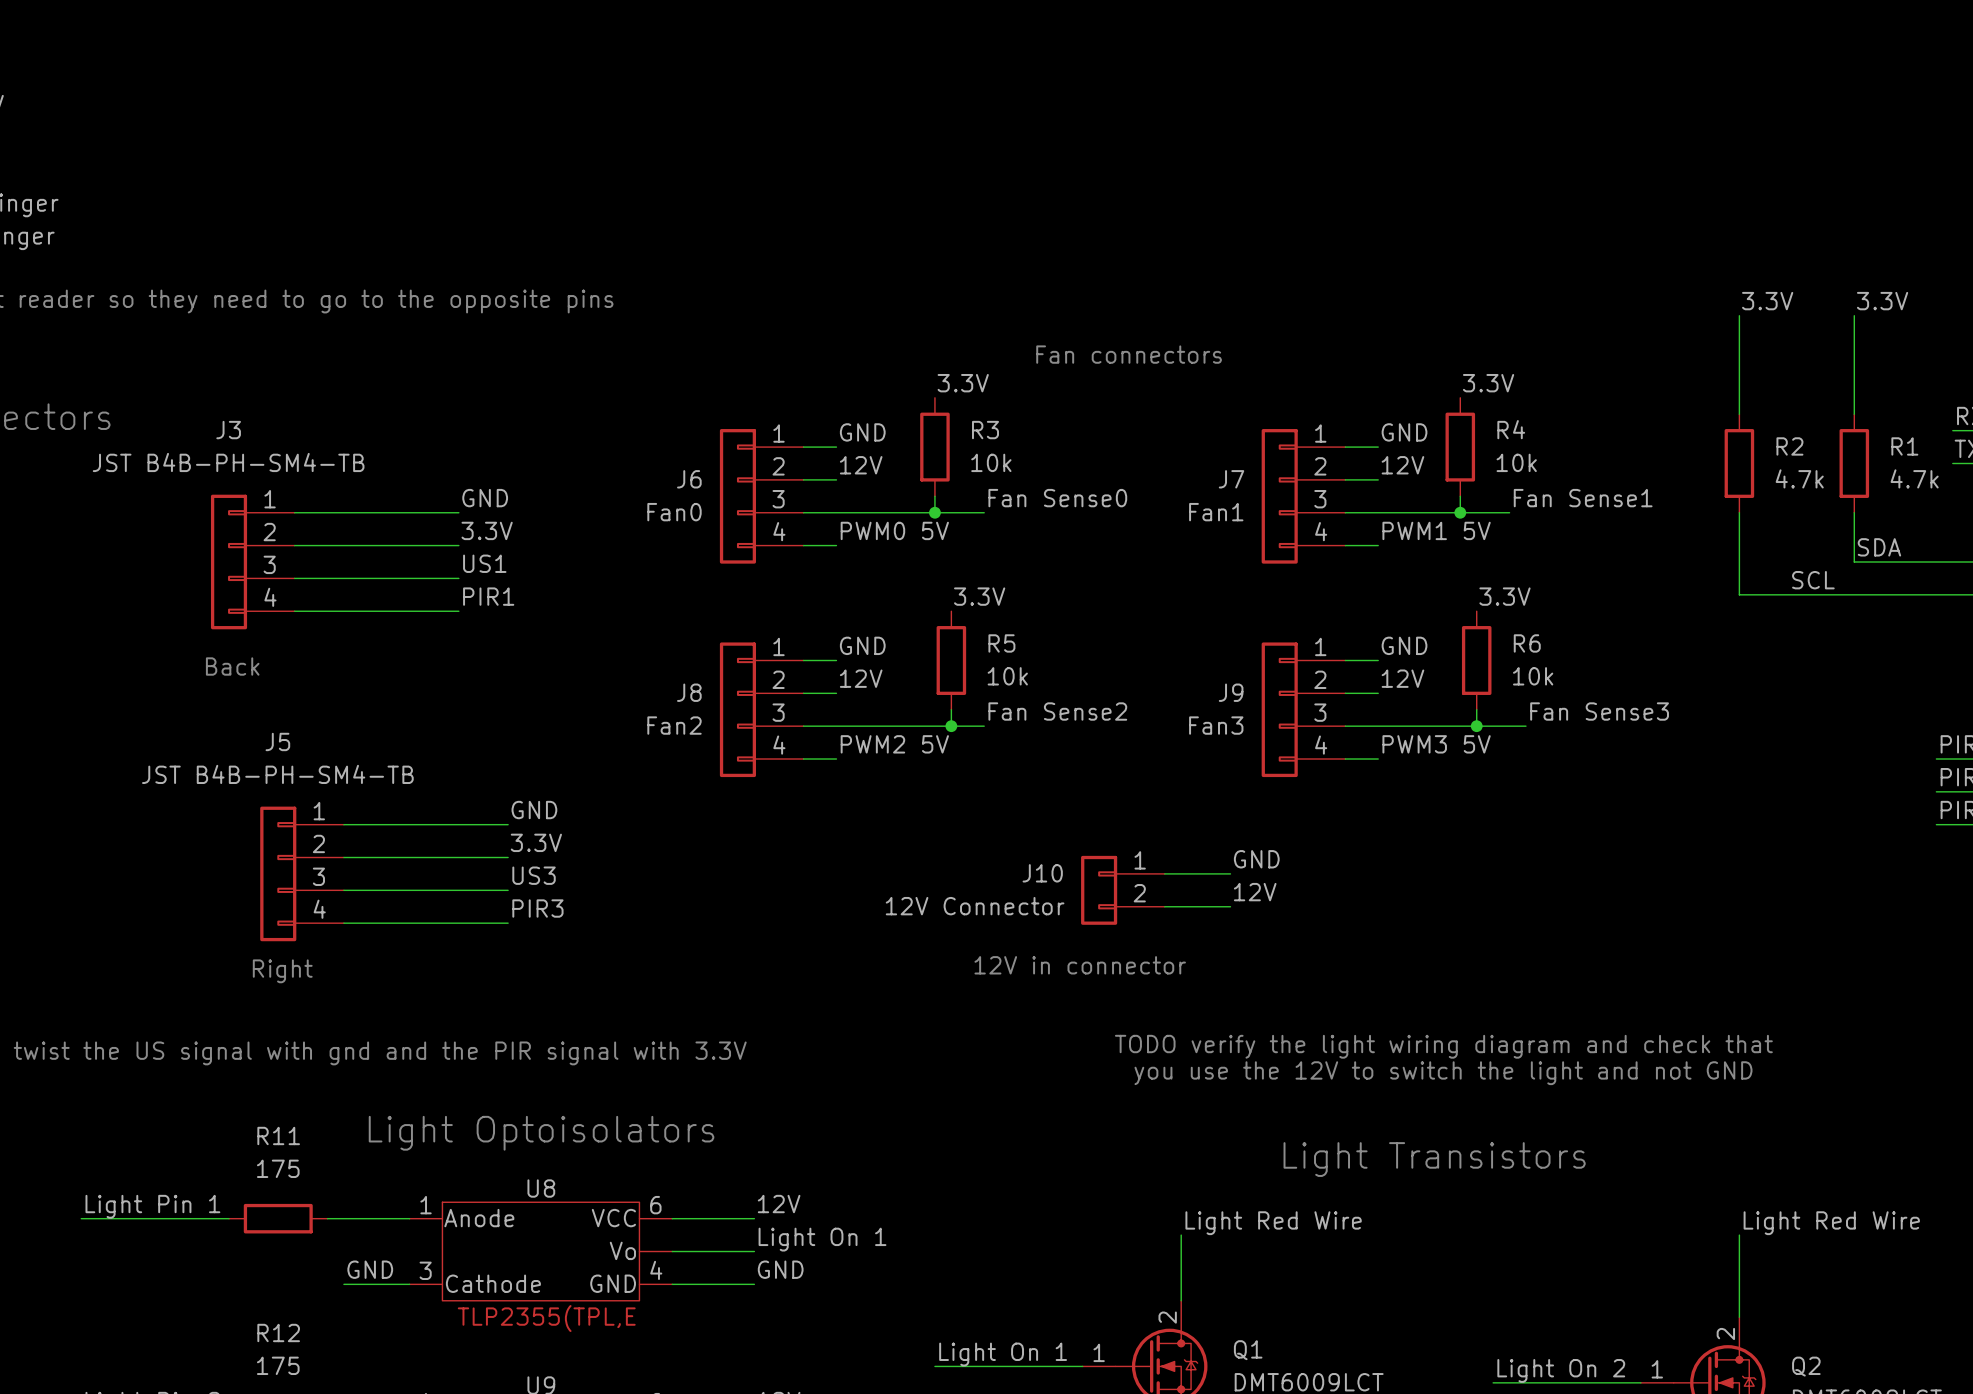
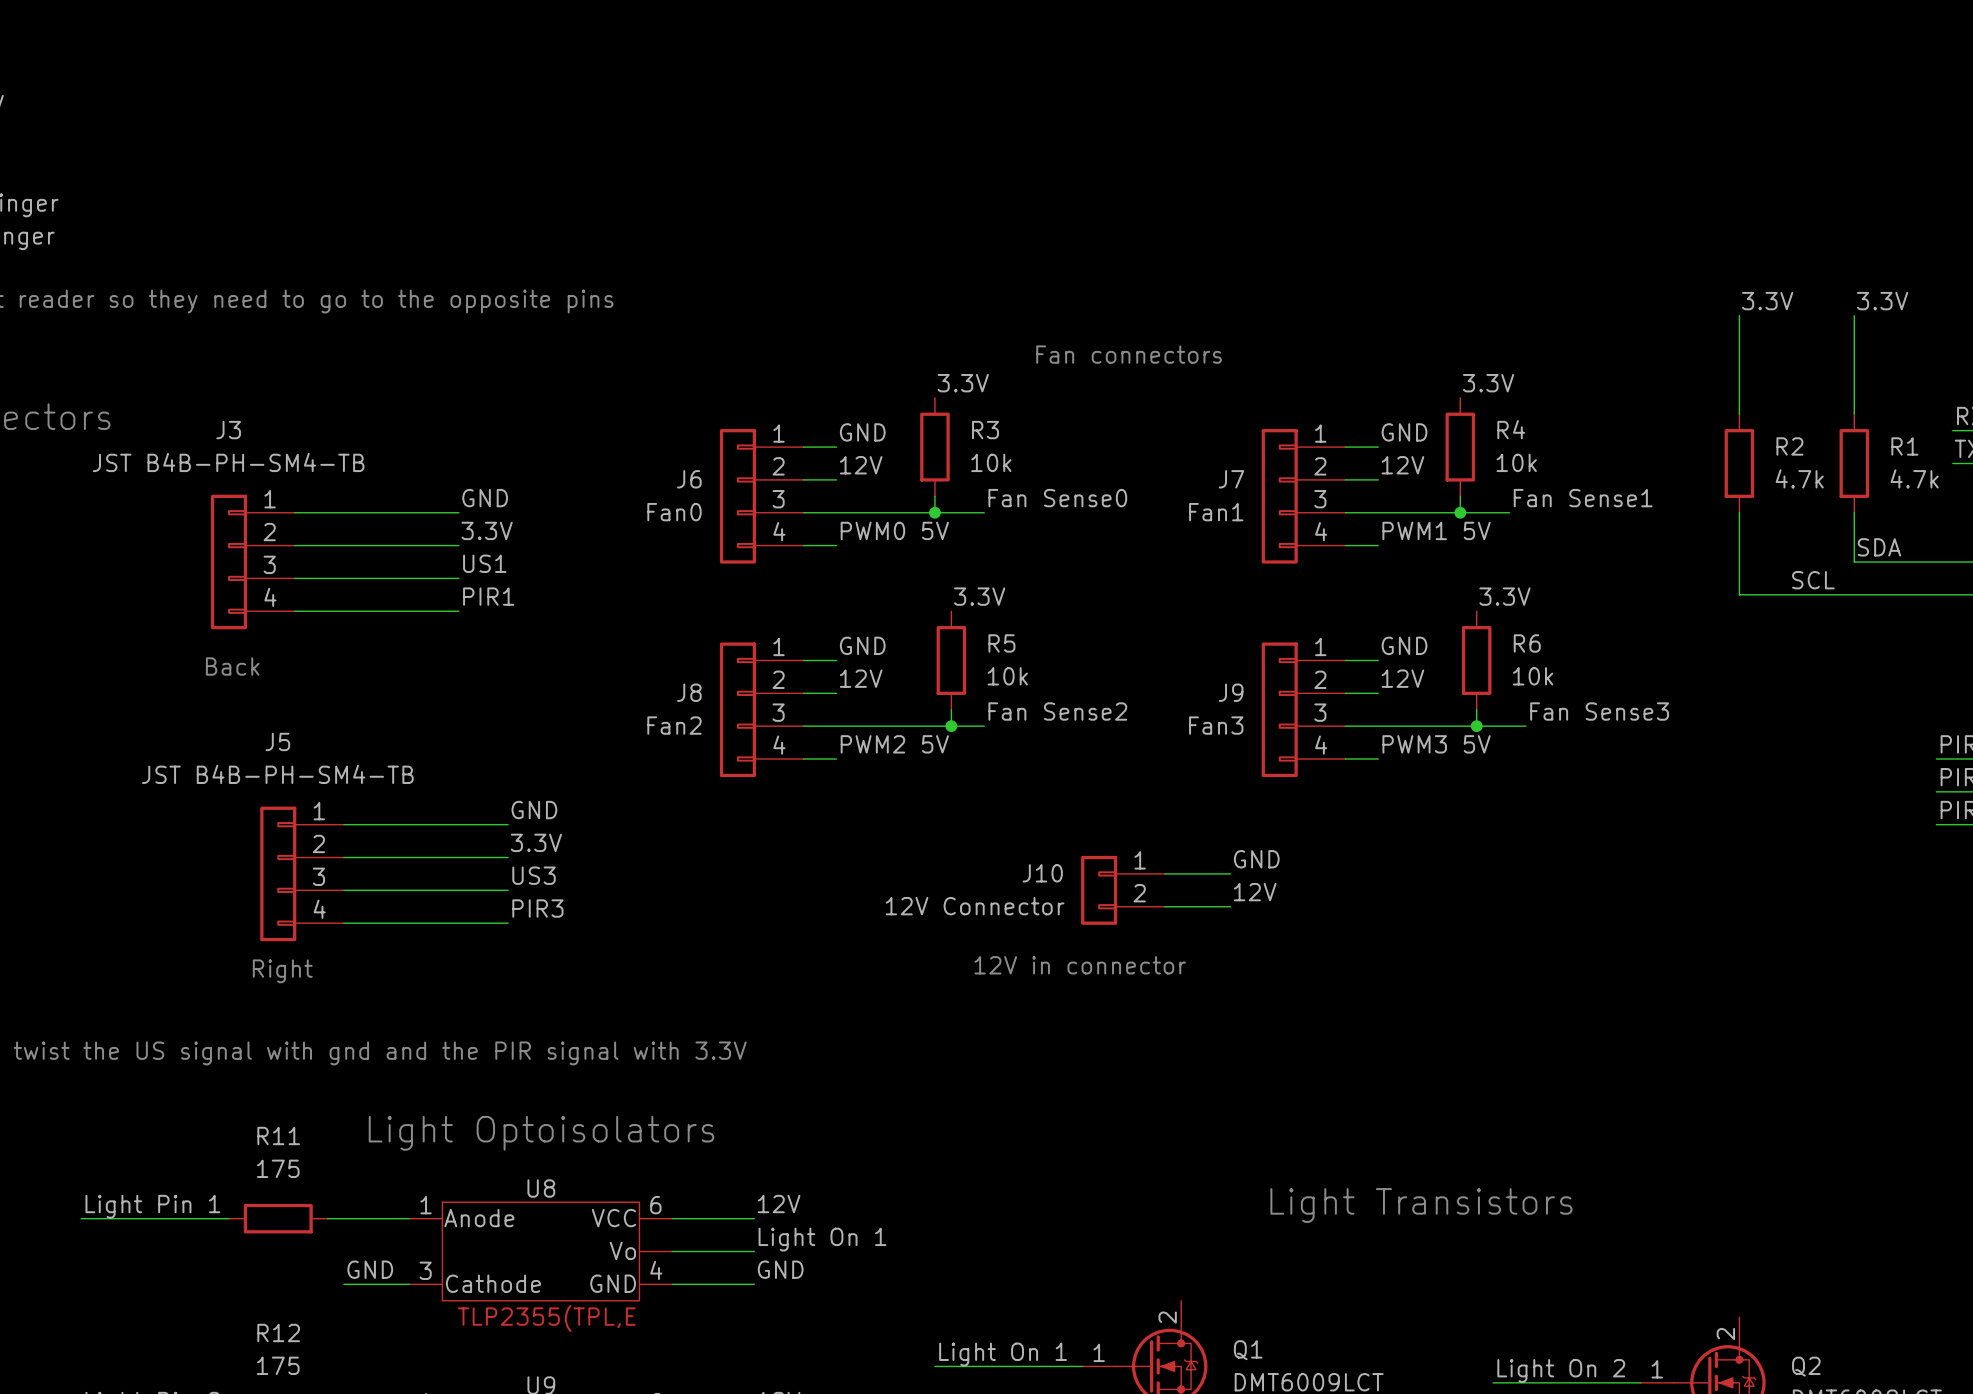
text: TODO verify the light wiring diagram and check that (1443, 1046) -> none
text: you use the 12V to switch the light and not GND (1443, 1073) -> none
text position: Light Transistors (1434, 1159) -> Light Transistors (1421, 1205)
label: Light Red Wire (1273, 1223) -> none
label: Light Red Wire (1831, 1223) -> none
wire: (1181, 1235) (1181, 1300) -> none
wire: (1739, 1235) (1739, 1317) -> none

